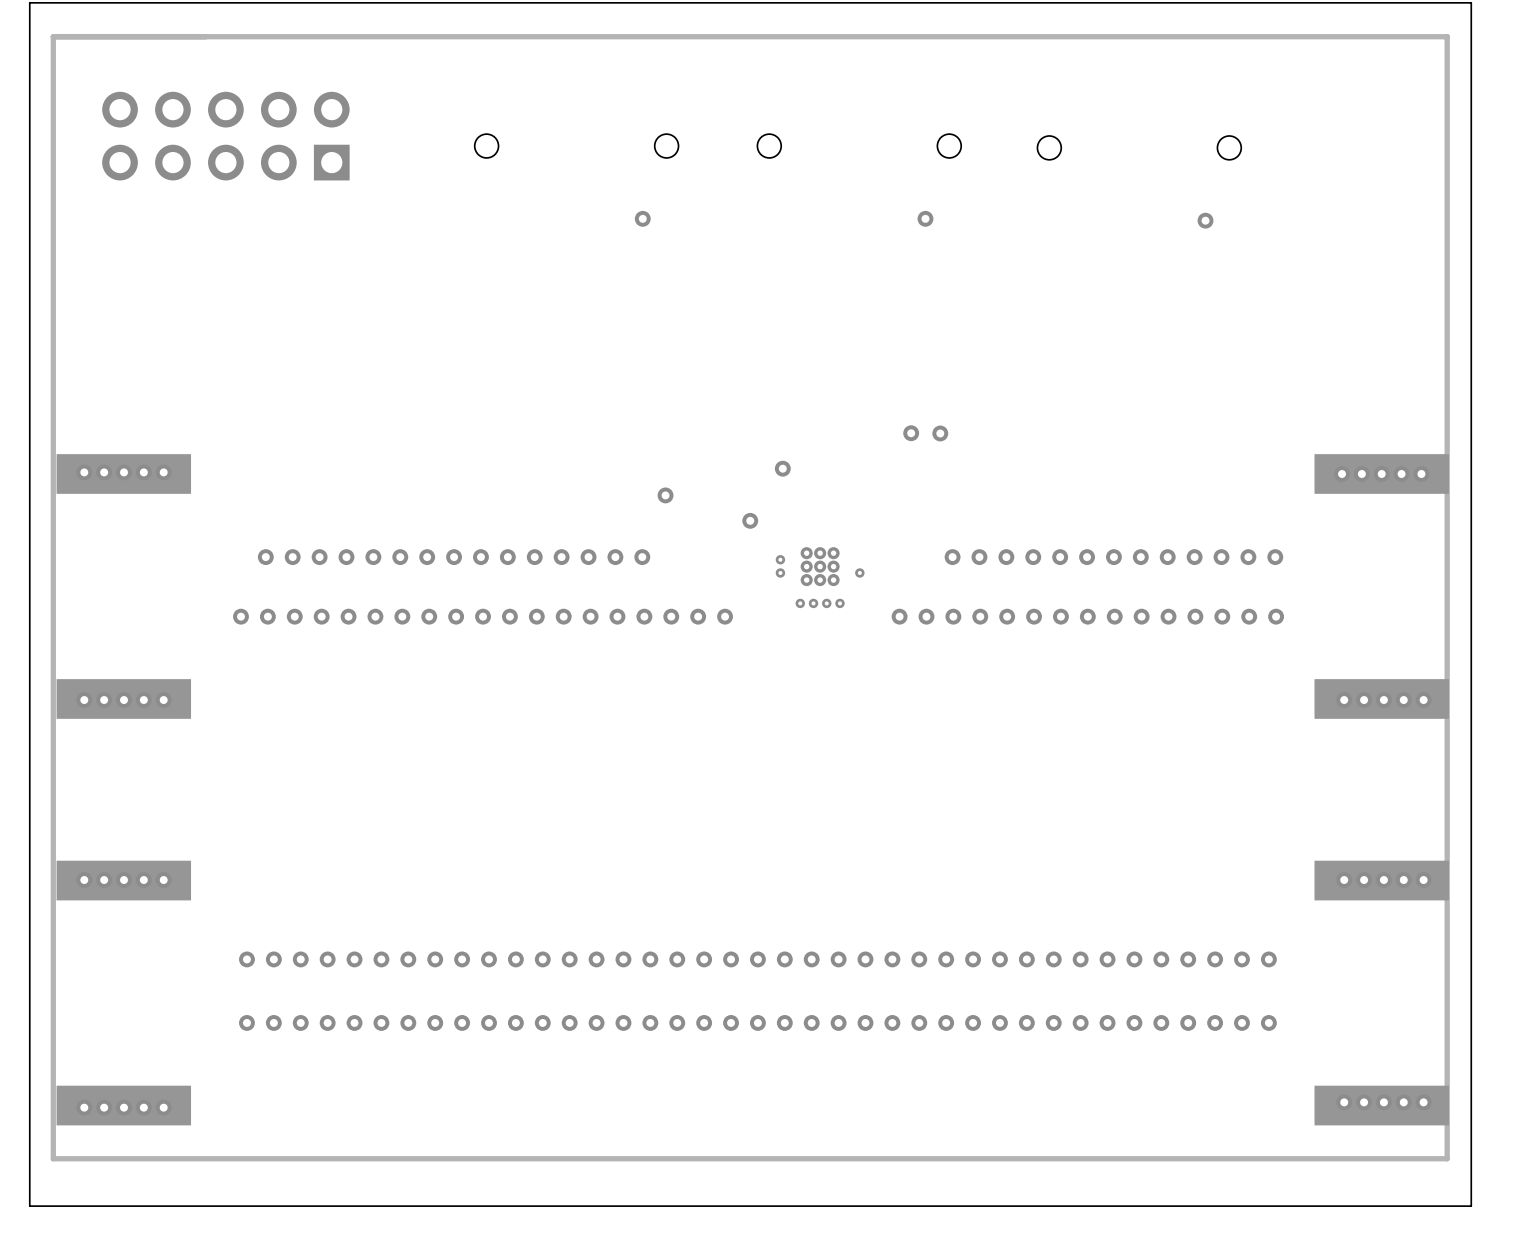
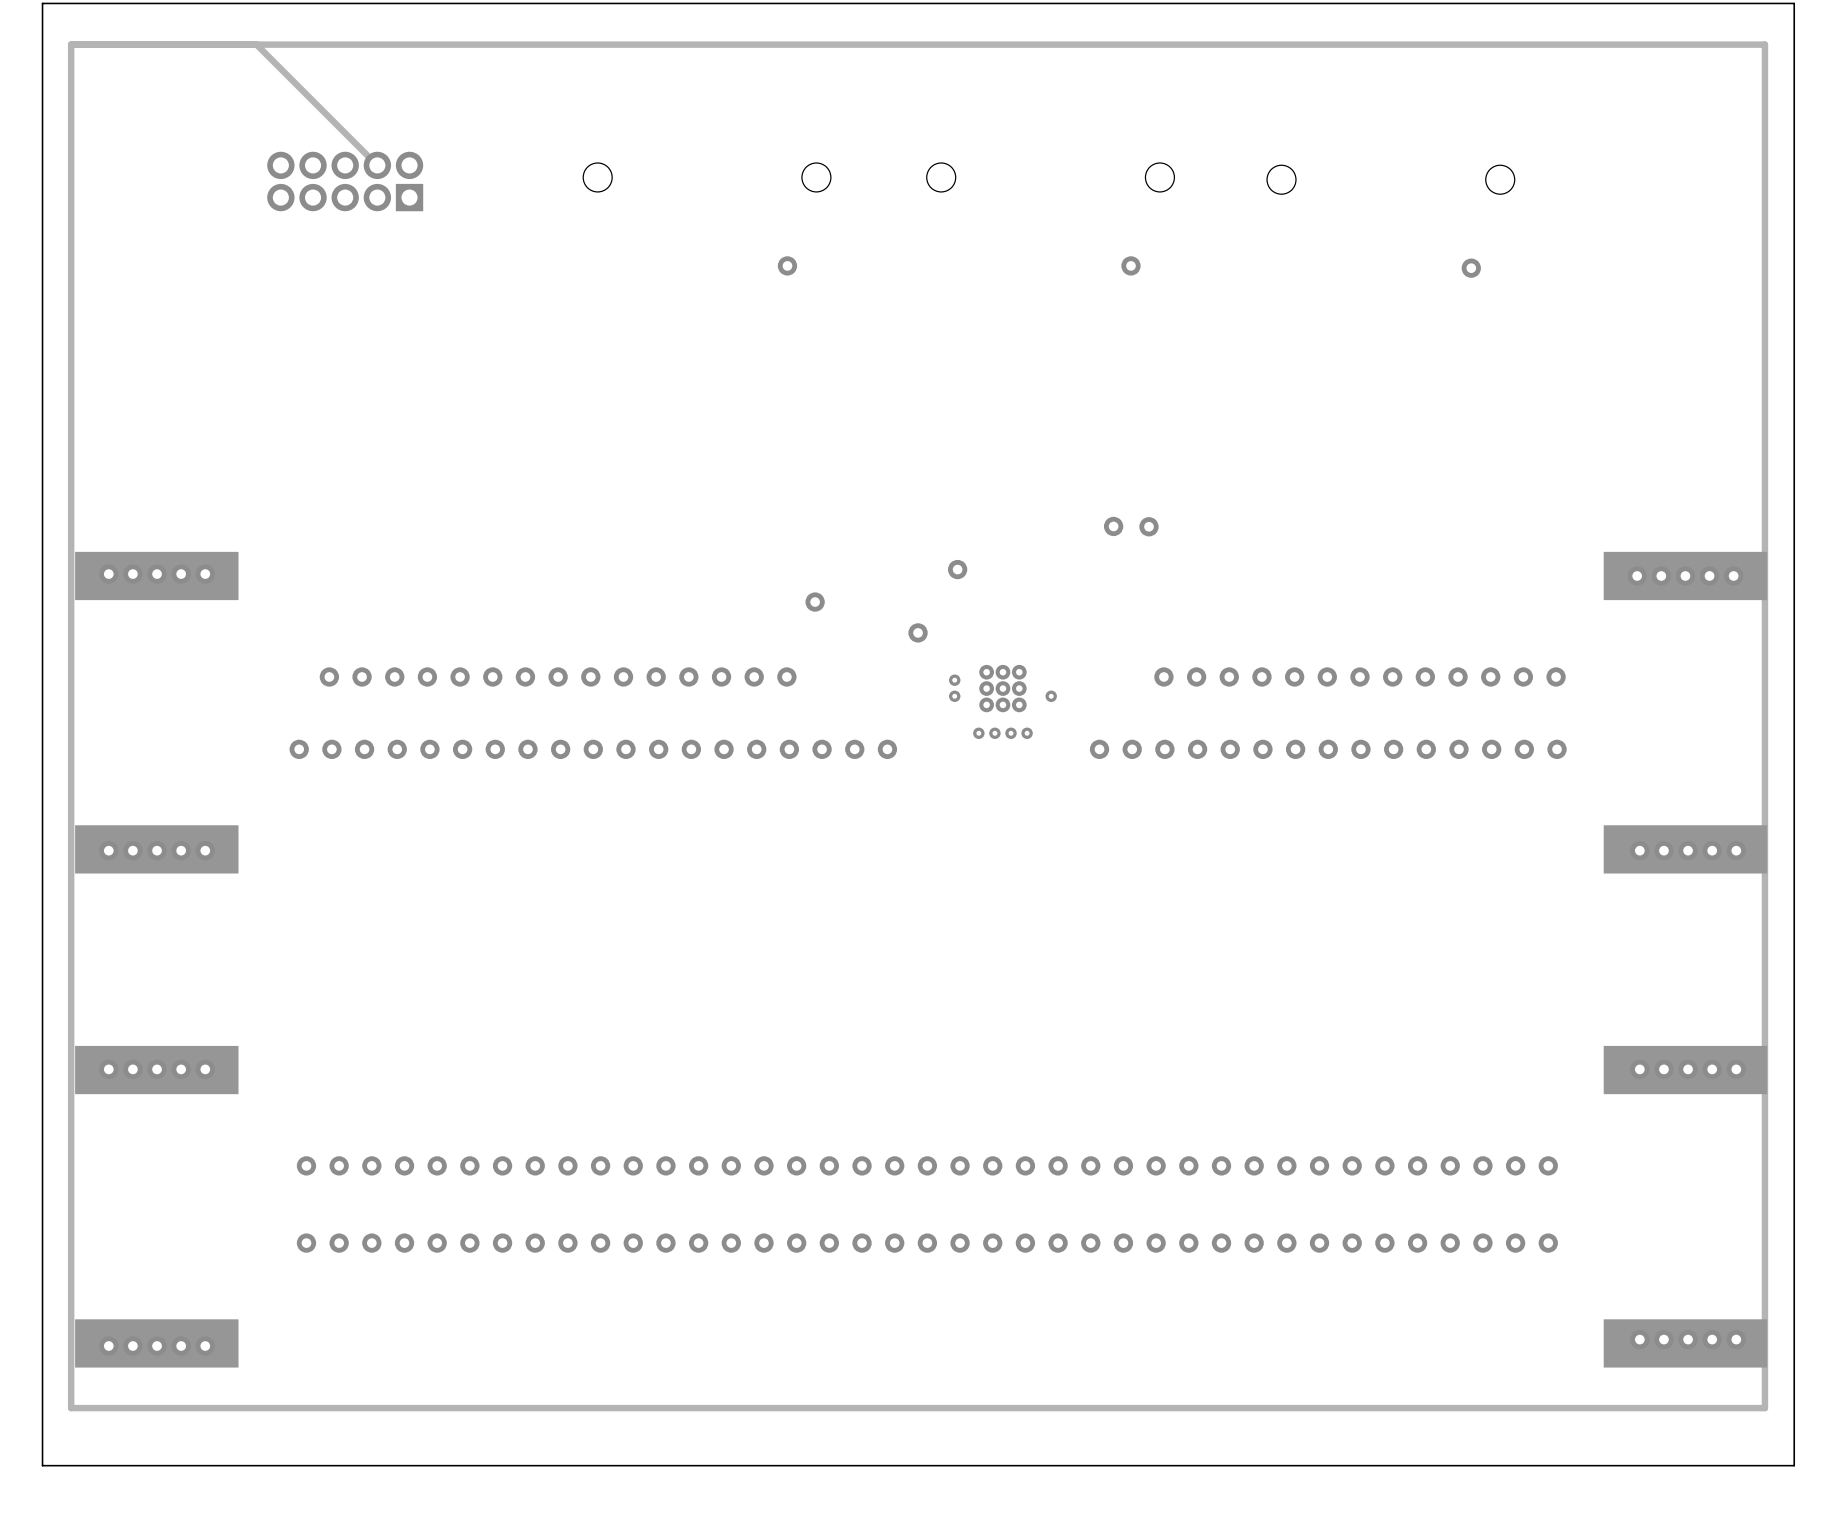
track: none -> (256, 44) (377, 165)
part: (225, 136) -> none
part: none -> (345, 181)

